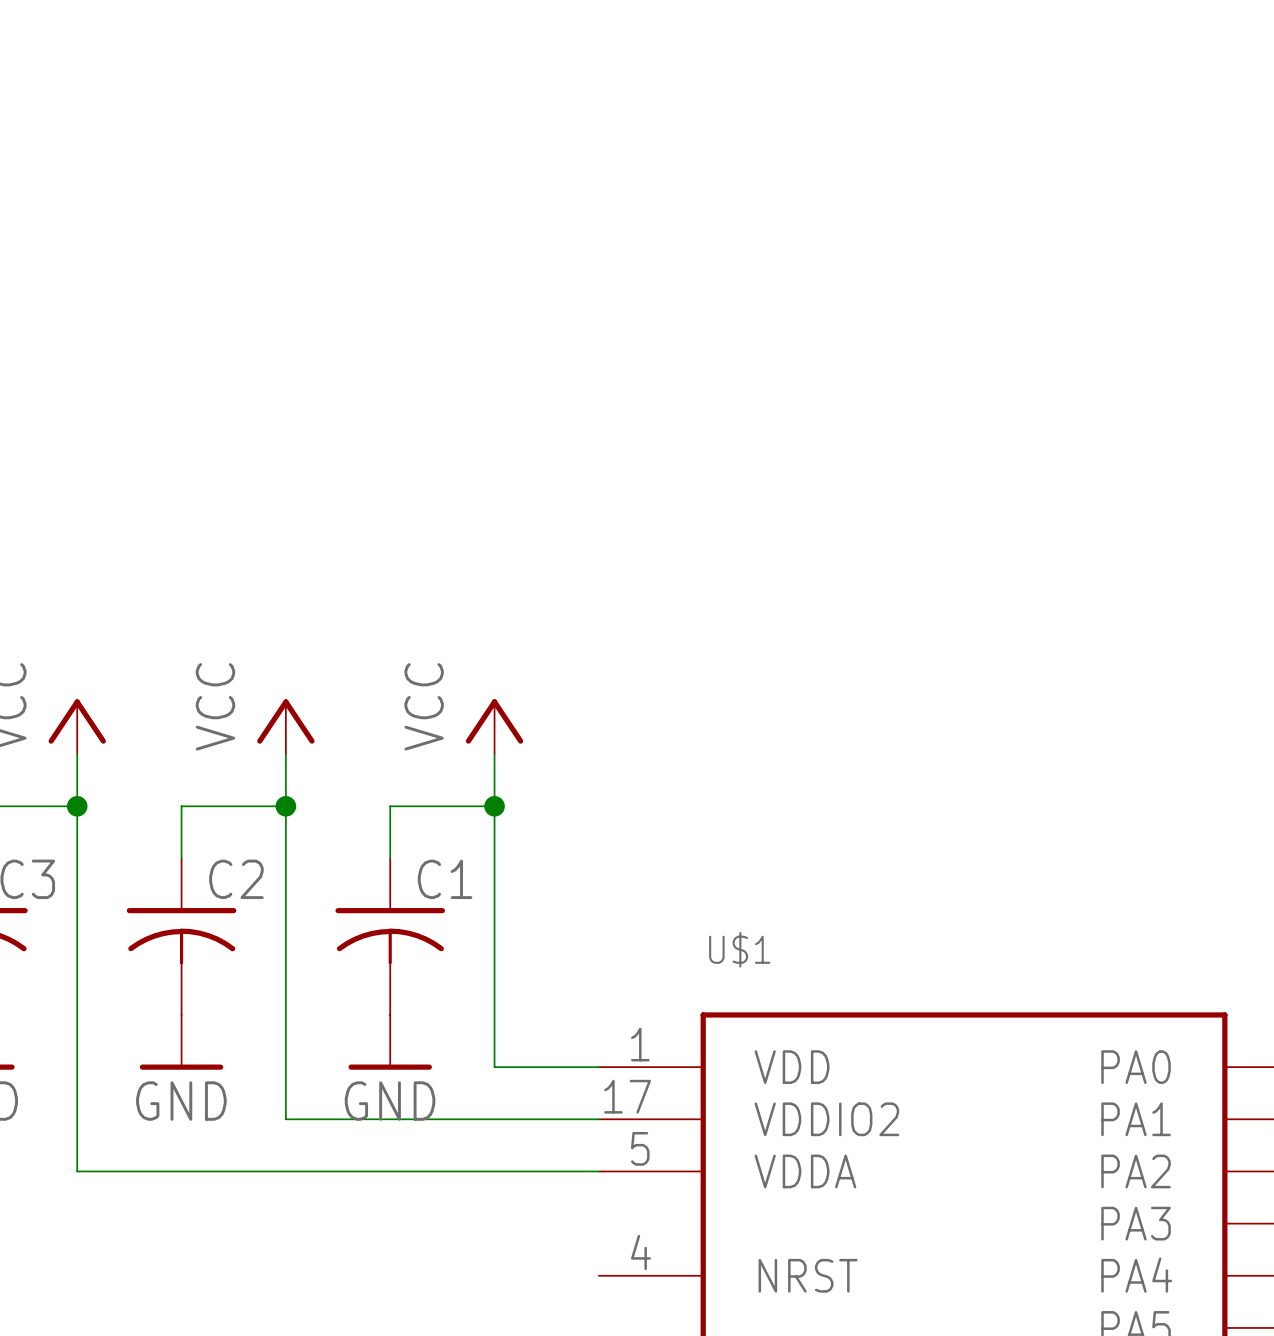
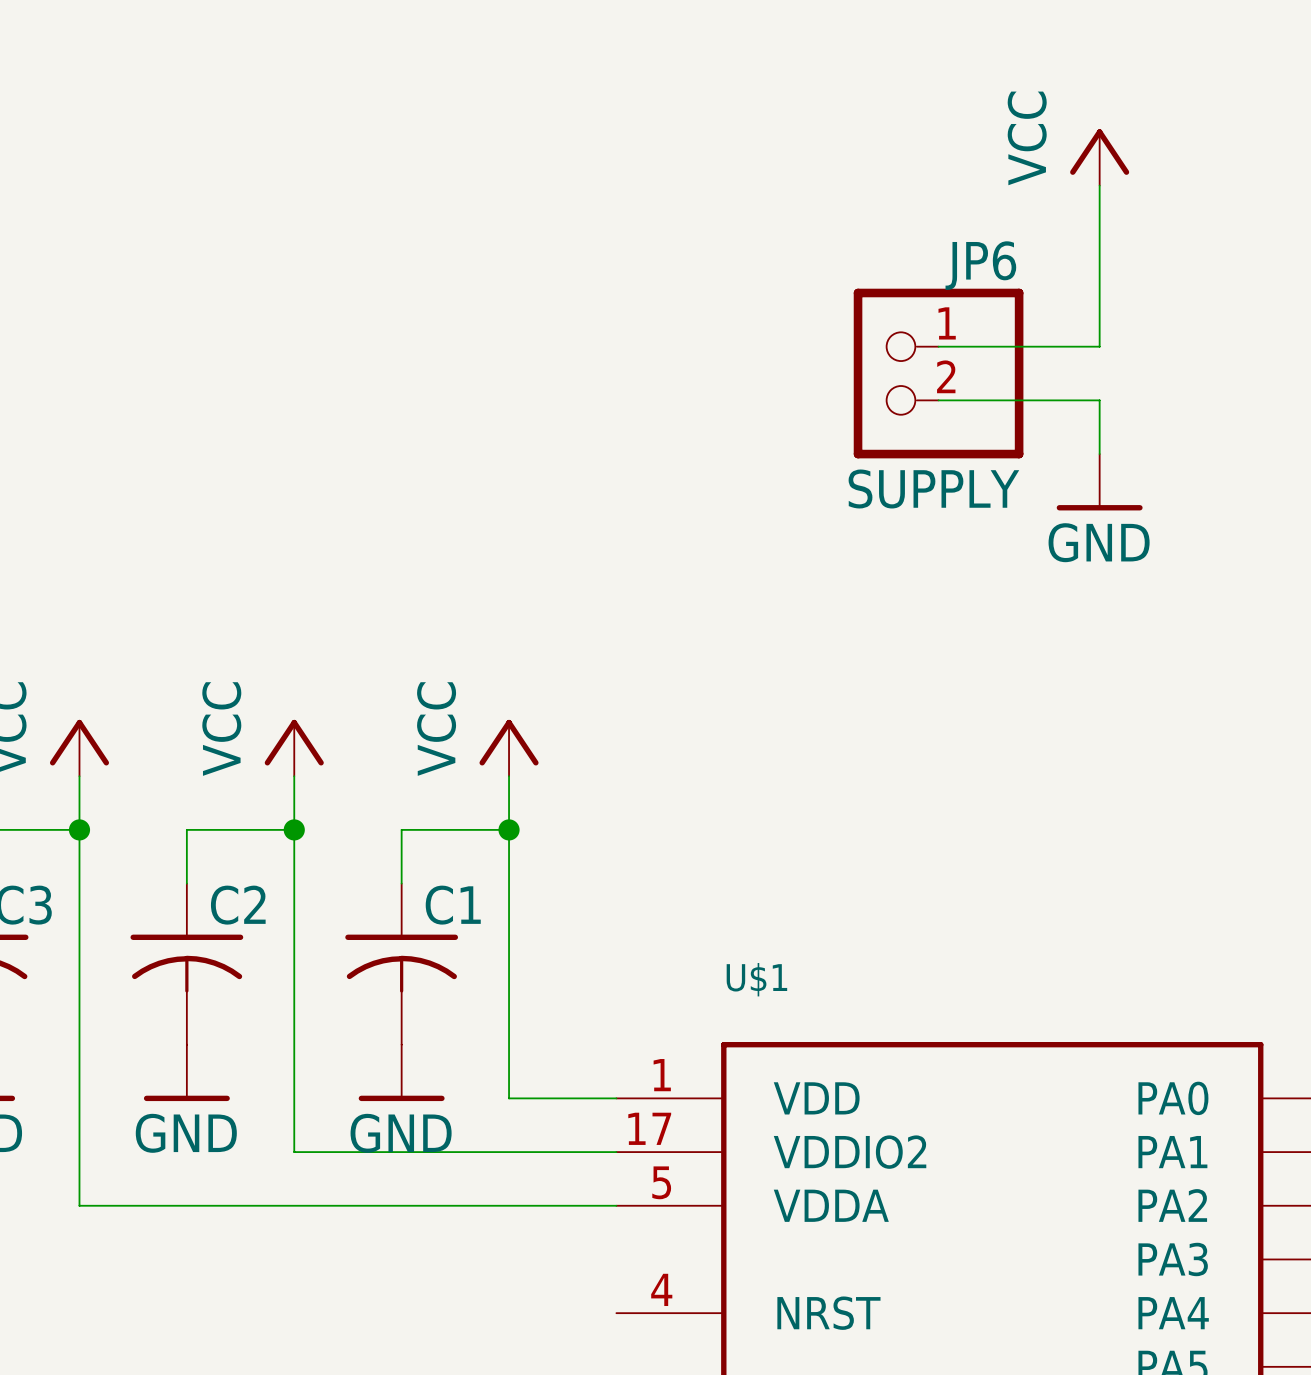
power symbol: none -> VCC (1099, 157)
wire: none -> (1099, 185) (1099, 346) (938, 346)
JP6: none -> SUPPLY (938, 373)
wire: none -> (938, 400) (1099, 400) (1099, 454)
power symbol: none -> GND (1099, 482)

